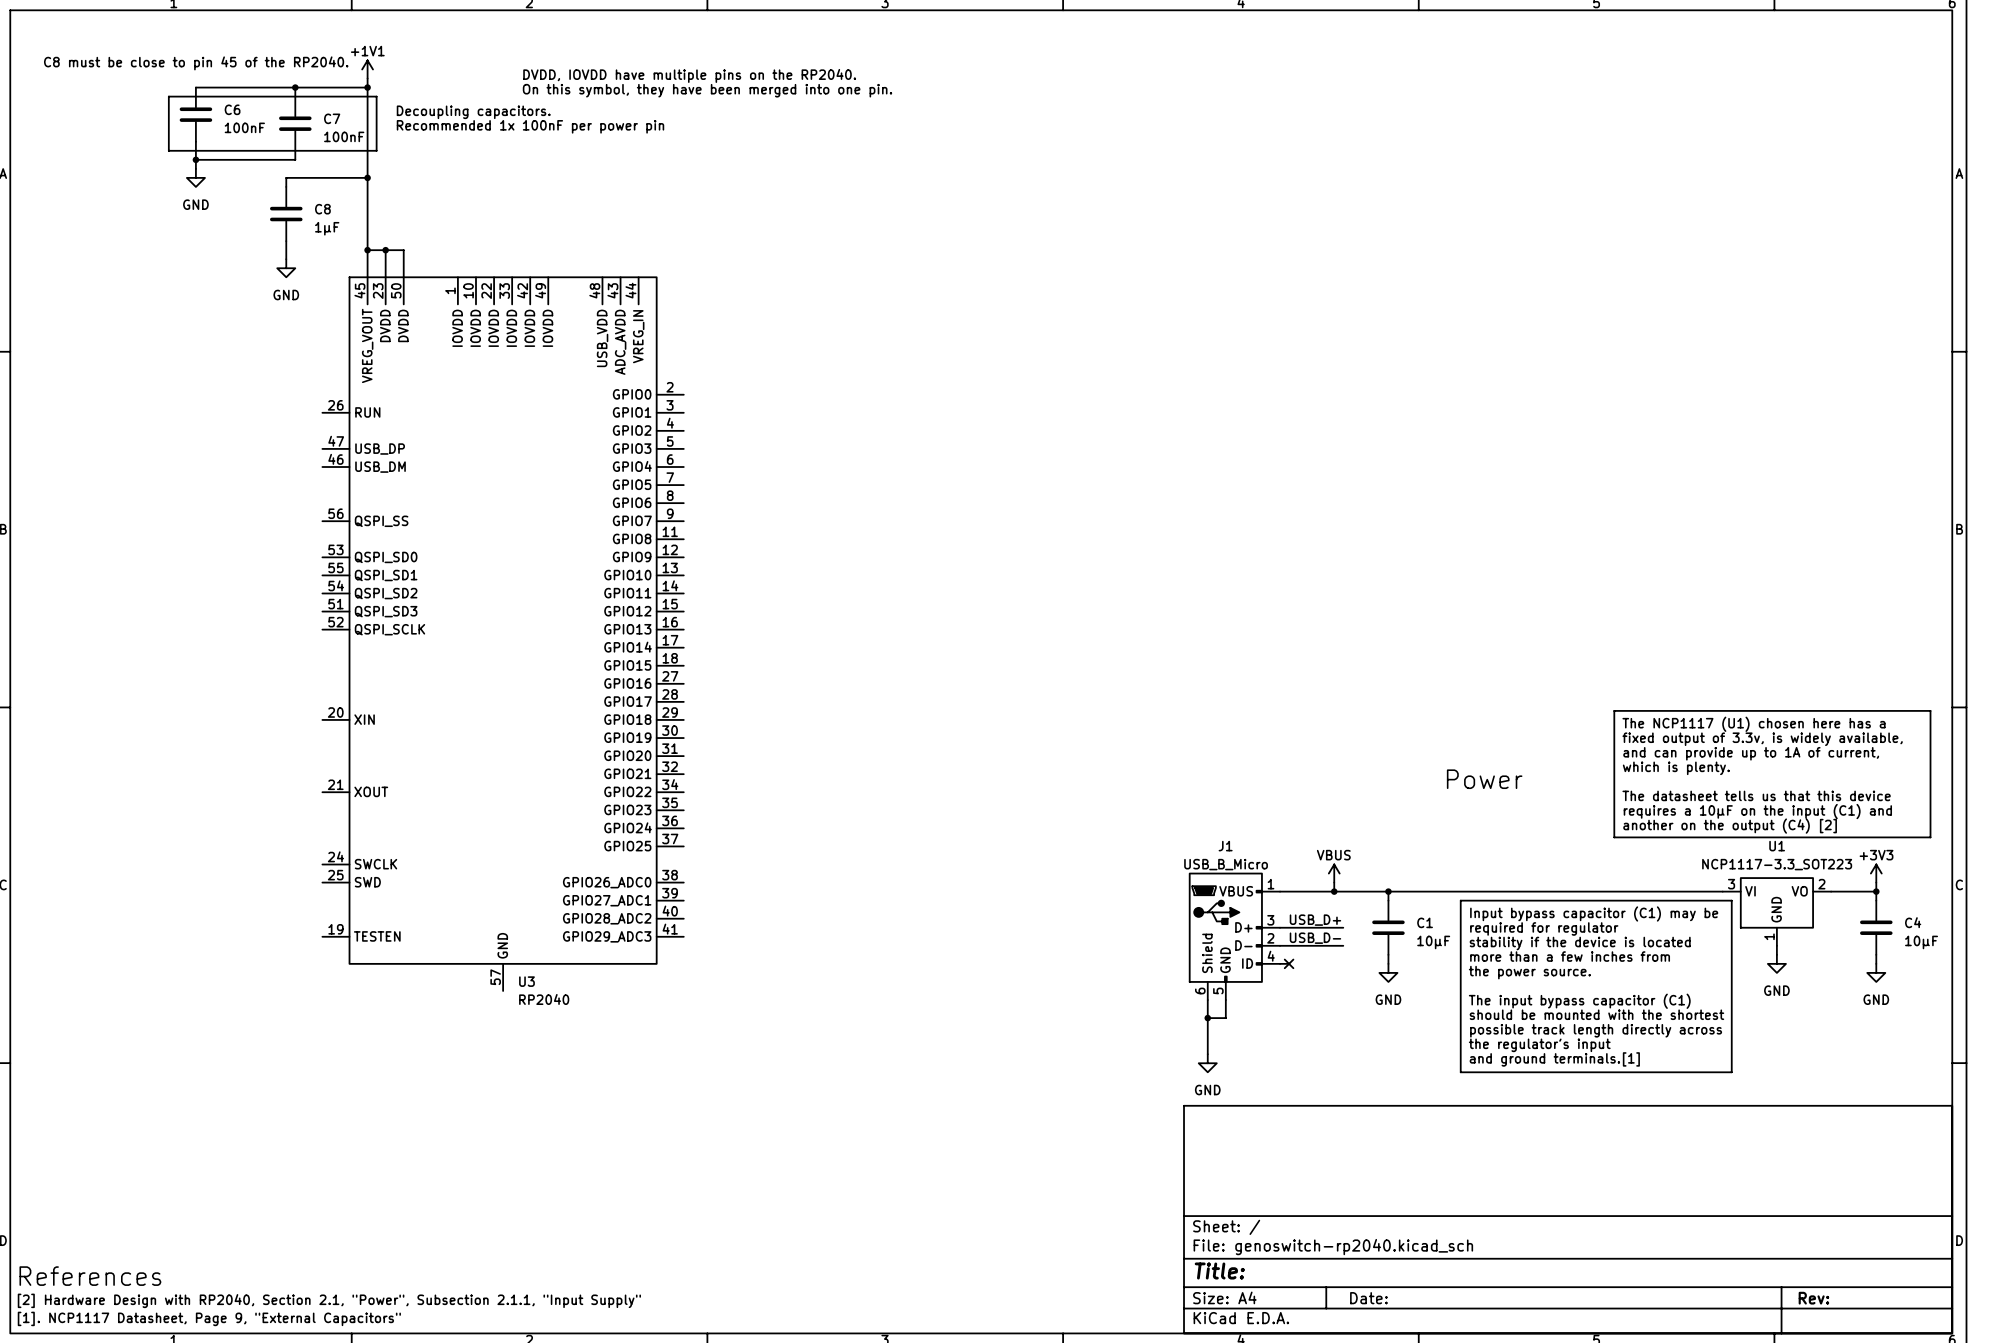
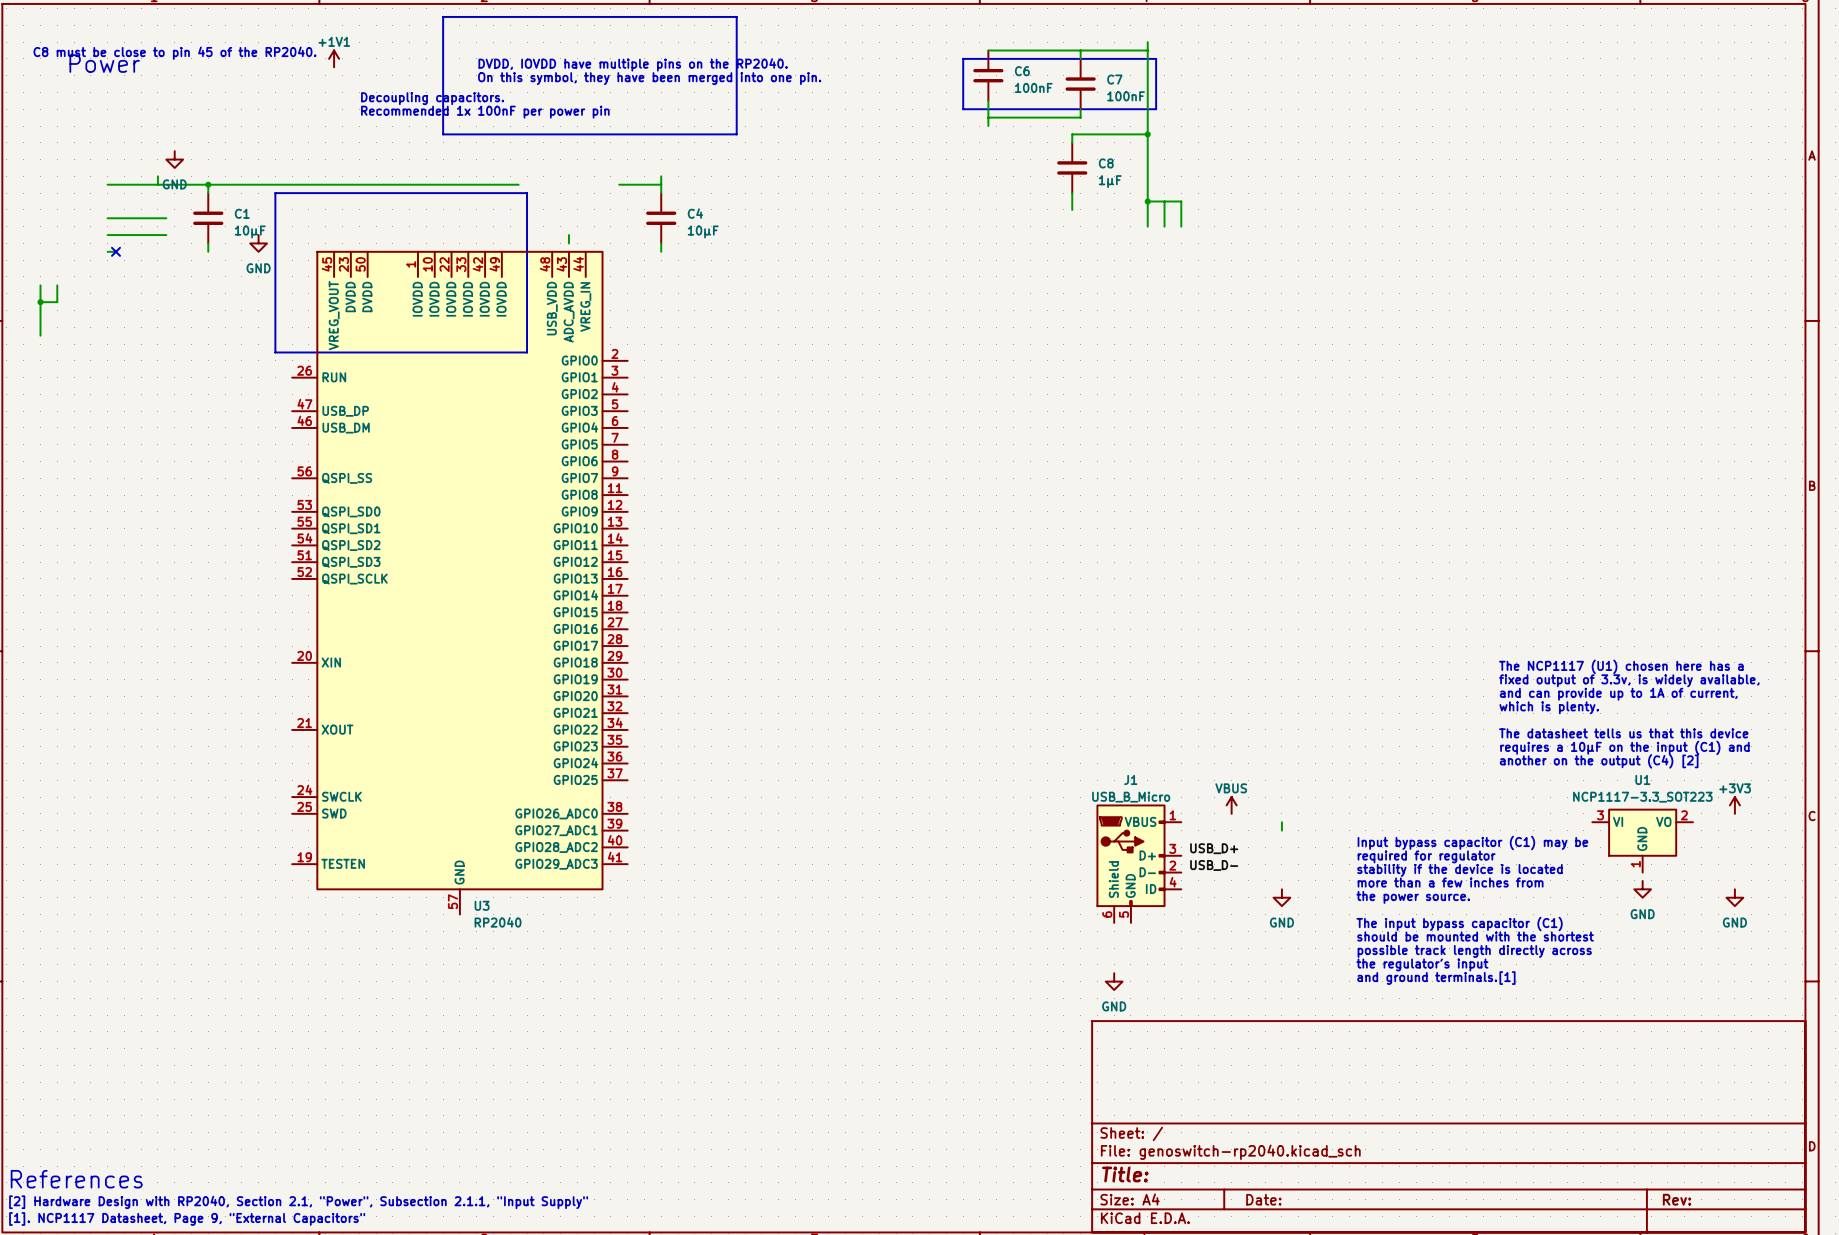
line: none -> (443, 16) (736, 16) (736, 134) (443, 134) (443, 16)
wire: none -> (1147, 42) (1147, 226)
wire: none -> (988, 50) (1147, 50)
wire: none -> (1080, 50) (1080, 58)
line: none -> (963, 58) (1156, 58) (1156, 109) (963, 109) (963, 58)
text: none -> Power (104, 63)
wire: (367, 78) (367, 277) -> none
wire: (195, 87) (367, 87) -> none
wire: (295, 87) (295, 96) -> (208, 184) (208, 193)
junction: (295, 87) -> none
junction: (367, 87) -> none
line: (168, 96) (376, 96) (376, 150) (168, 150) (168, 96) -> none
C6 position: (195, 114) -> (988, 75)
wire: none -> (988, 100) (988, 126)
C7 position: (295, 123) -> (1080, 84)
wire: none -> (1080, 109) (1080, 117) (988, 117)
wire: (195, 141) (195, 168) -> none
wire: (295, 150) (295, 159) (195, 159) -> none
wire: none -> (1147, 134) (1072, 134) (1072, 142)
junction: none -> (1147, 134)
junction: (195, 159) -> none
wire: (367, 177) (286, 177) (286, 186) -> none
junction: (367, 177) -> none
wire: none -> (157, 176) (157, 184)
wire: none -> (661, 176) (661, 193)
wire: none -> (107, 184) (518, 184)
junction: none -> (208, 184)
wire: none -> (619, 184) (661, 184)
C8 position: (286, 214) -> (1072, 167)
line: none -> (275, 193) (527, 193) (527, 352) (275, 352) (275, 193)
wire: none -> (1072, 193) (1072, 209)
wire: none -> (1147, 201) (1181, 201) (1181, 226)
junction: none -> (1147, 201)
wire: none -> (1164, 201) (1164, 226)
wire: none -> (107, 218) (166, 218)
wire: (286, 241) (286, 259) -> none
wire: (367, 250) (403, 250) (403, 277) -> none
junction: (367, 250) -> none
wire: (385, 250) (385, 277) -> none
junction: (385, 250) -> none
wire: none -> (107, 235) (166, 235)
wire: none -> (568, 235) (568, 243)
wire: none -> (208, 243) (208, 251)
wire: none -> (661, 243) (661, 251)
wire: none -> (107, 251) (115, 251)
no-connect mark: none -> (115, 251)
wire: none -> (40, 285) (40, 335)
wire: none -> (57, 285) (57, 302) (40, 302)
junction: none -> (40, 302)
line: (1614, 710) (1930, 710) (1930, 837) (1614, 837) (1614, 710) -> none
text: Power (1484, 779) -> none
wire: (1334, 882) (1334, 891) -> none
wire: (1876, 882) (1876, 900) -> none
wire: (1280, 891) (1722, 891) -> none
junction: (1334, 891) -> none
junction: (1388, 891) -> none
wire: (1831, 891) (1876, 891) -> none
junction: (1876, 891) -> none
line: (1460, 900) (1731, 900) (1731, 1072) (1460, 1072) (1460, 900) -> none
wire: (1280, 927) (1343, 927) -> none
C1 position: (1388, 927) -> (208, 218)
C4 position: (1876, 927) -> (661, 218)
wire: (1280, 945) (1343, 945) -> none
wire: (1776, 945) (1776, 954) -> none
wire: (1388, 954) (1388, 963) -> none
wire: (1876, 954) (1876, 963) -> none
wire: (1280, 963) (1289, 963) -> none
no-connect mark: (1289, 963) -> none
wire: (1207, 1000) (1207, 1054) -> none
wire: (1225, 1000) (1225, 1018) (1207, 1018) -> none
junction: (1207, 1018) -> none

